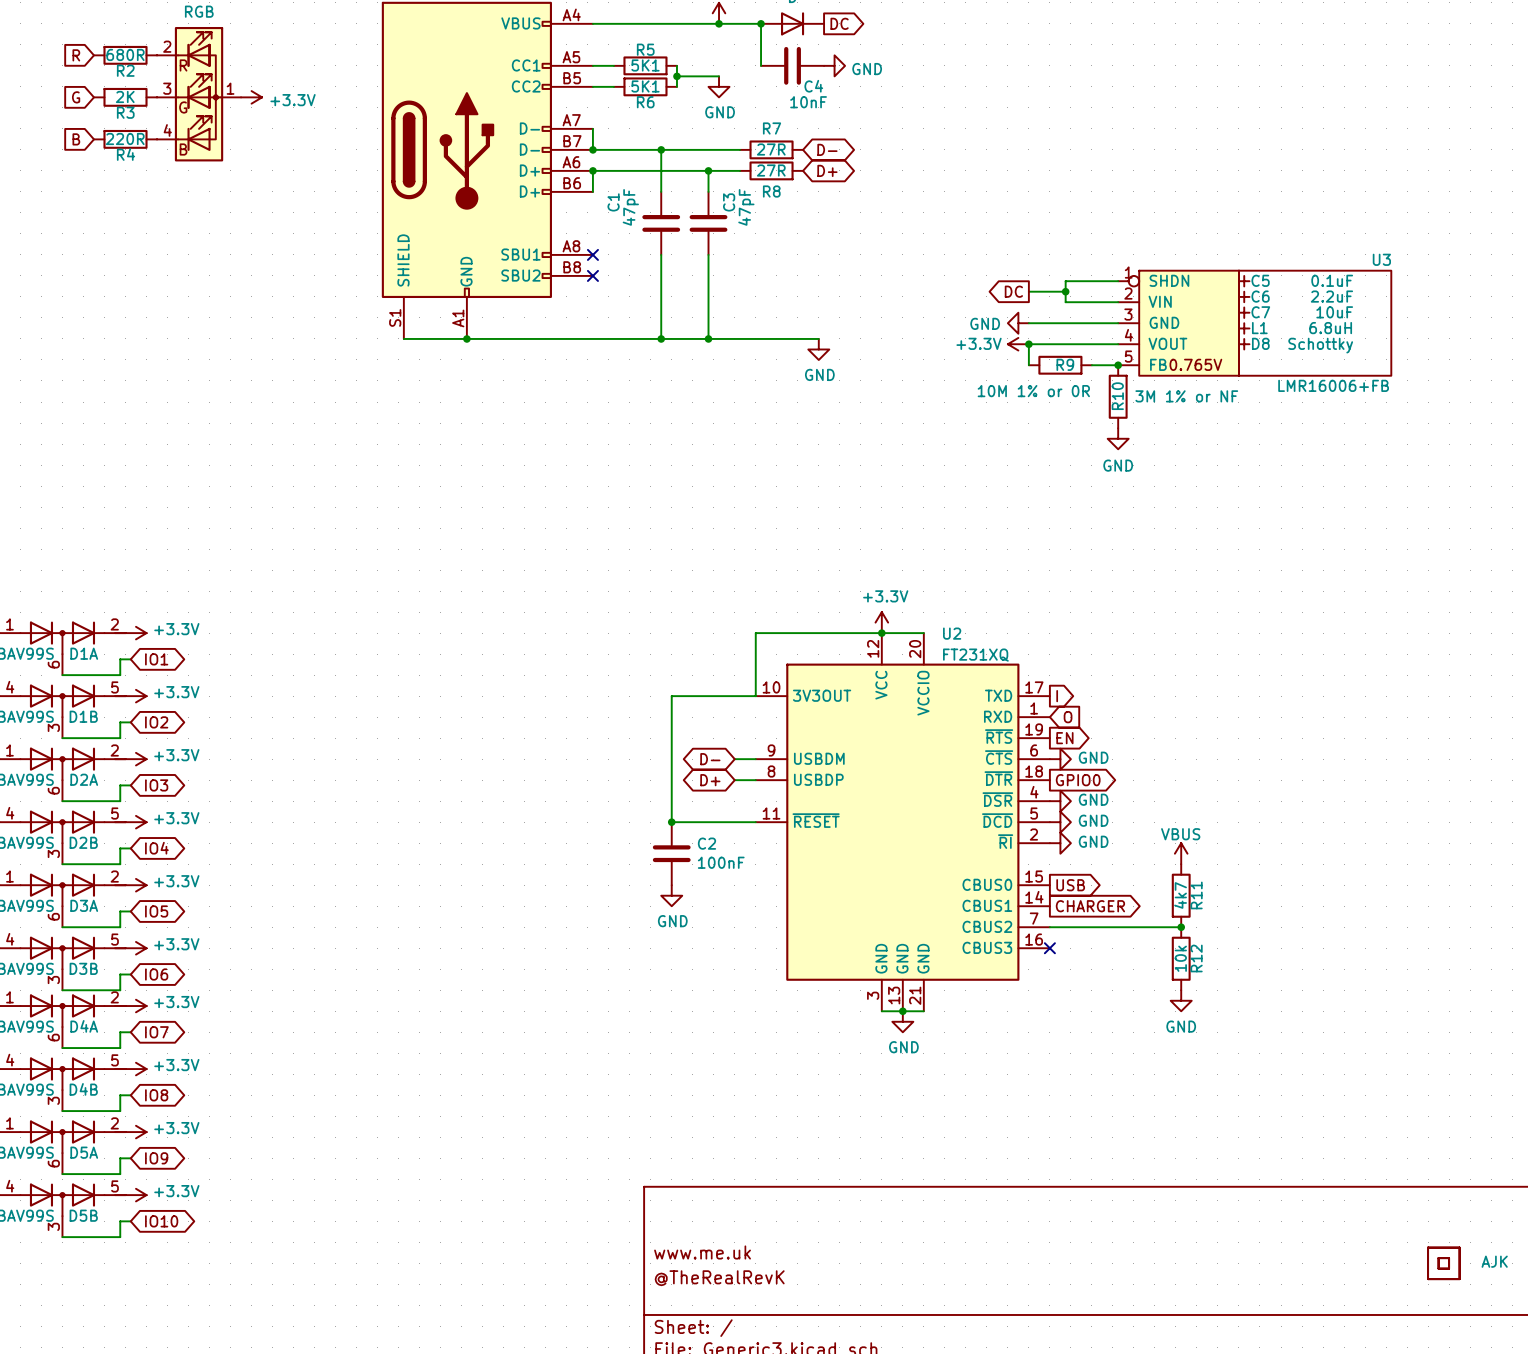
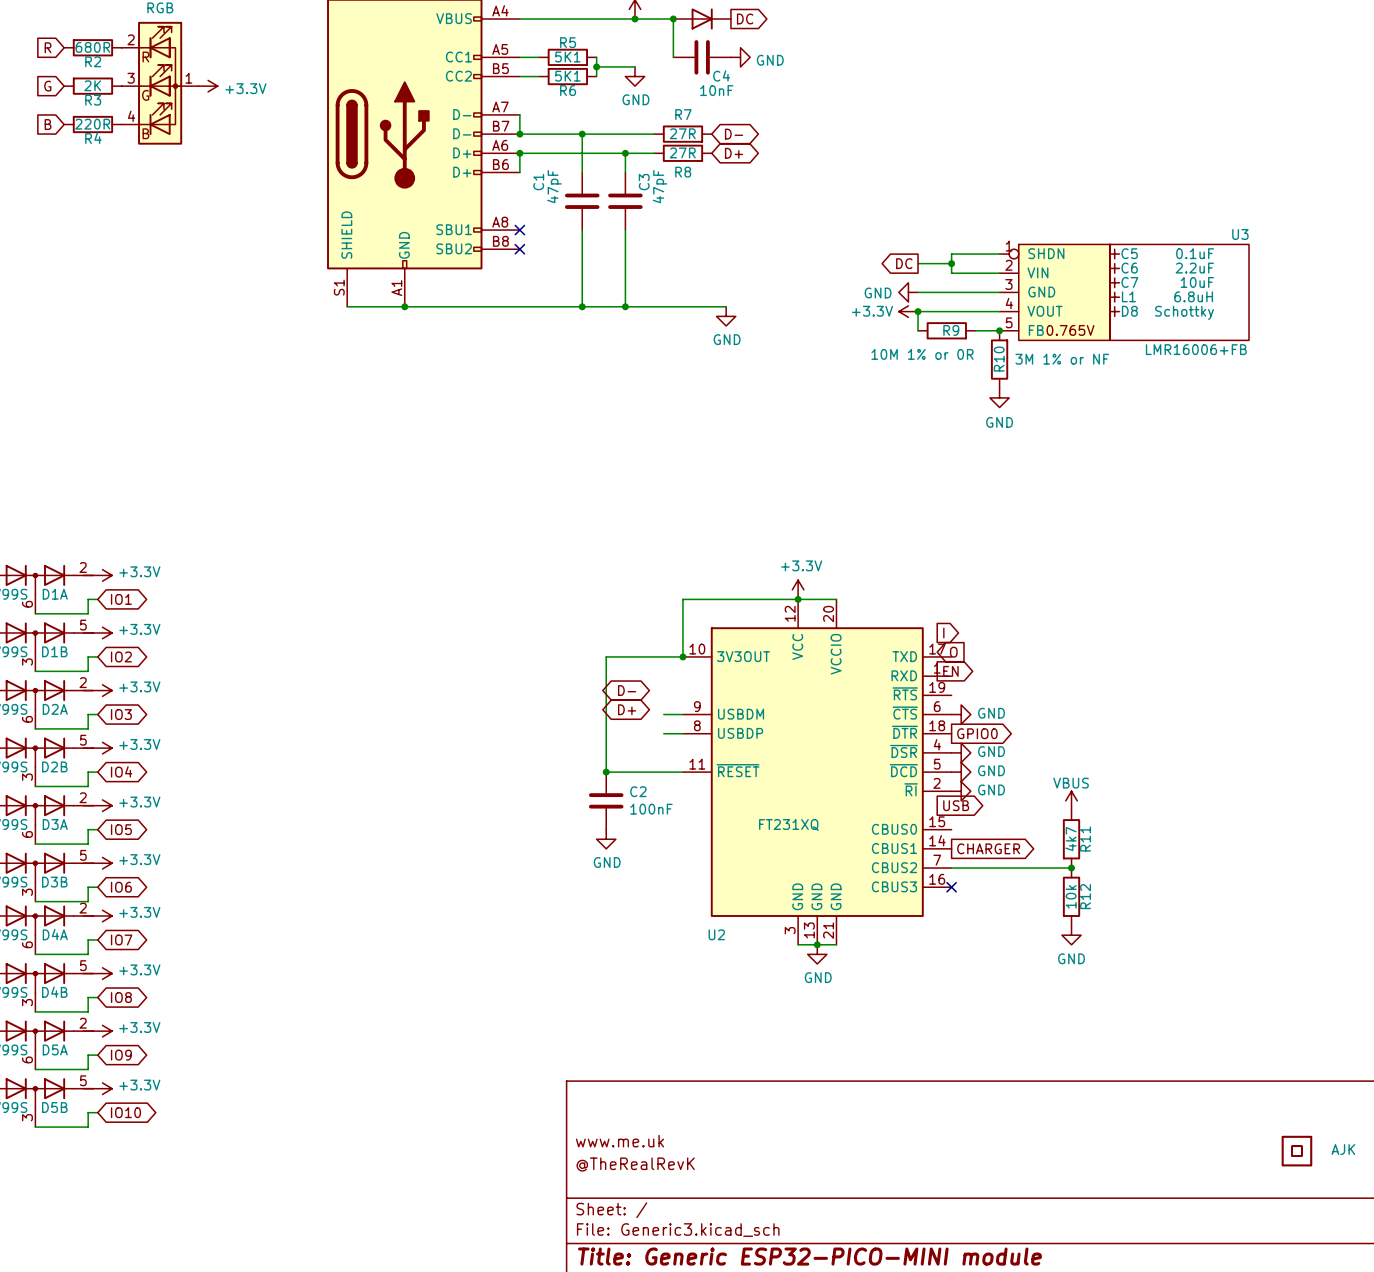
power symbol position: +3.3V (881, 622) -> +3.3V (798, 589)
junction position: (881, 633) -> (798, 599)
wire: (923, 633) (755, 633) (755, 696) (671, 696) (671, 822) (755, 822) -> (836, 599) (682, 599) (682, 656) (606, 656) (606, 772) (682, 772)
U2 name position: U2 (952, 633) -> U2 (716, 934)
U2 value position: FT231XQ (975, 655) -> FT231XQ (788, 824)
junction: none -> (682, 656)
wire: (734, 759) (755, 759) -> (663, 714) (682, 714)
power symbol: GND (1060, 759) -> none
wire: (734, 780) (755, 780) -> (663, 733) (682, 733)
global label position: GPIO0 (1078, 780) -> GPIO0 (977, 733)
power symbol: none -> GND (961, 714)
power symbol: GND (1060, 801) -> none
junction position: (671, 822) -> (606, 772)
U2 position: (902, 822) -> (817, 772)
power symbol: GND (1060, 822) -> none
power symbol: none -> GND (961, 752)
power symbol: GND (1060, 843) -> none
power symbol: none -> GND (961, 772)
C2 position: (671, 853) -> (606, 800)
power symbol position: VBUS (1181, 853) -> VBUS (1071, 800)
power symbol: none -> GND (961, 791)
power symbol position: GND (671, 895) -> GND (606, 839)
R11 position: (1181, 895) -> (1071, 839)
global label position: CHARGER (1090, 906) -> CHARGER (988, 848)
wire: (1049, 927) (1181, 927) -> (951, 868) (1071, 868)
junction position: (1181, 927) -> (1071, 868)
no-connect mark position: (1049, 948) -> (951, 887)
R12 position: (1181, 958) -> (1071, 896)
power symbol position: GND (1181, 1000) -> GND (1071, 935)
wire: (881, 1011) (923, 1011) -> (798, 944) (836, 944)
junction position: (902, 1011) -> (817, 944)
power symbol position: GND (902, 1021) -> GND (817, 954)

